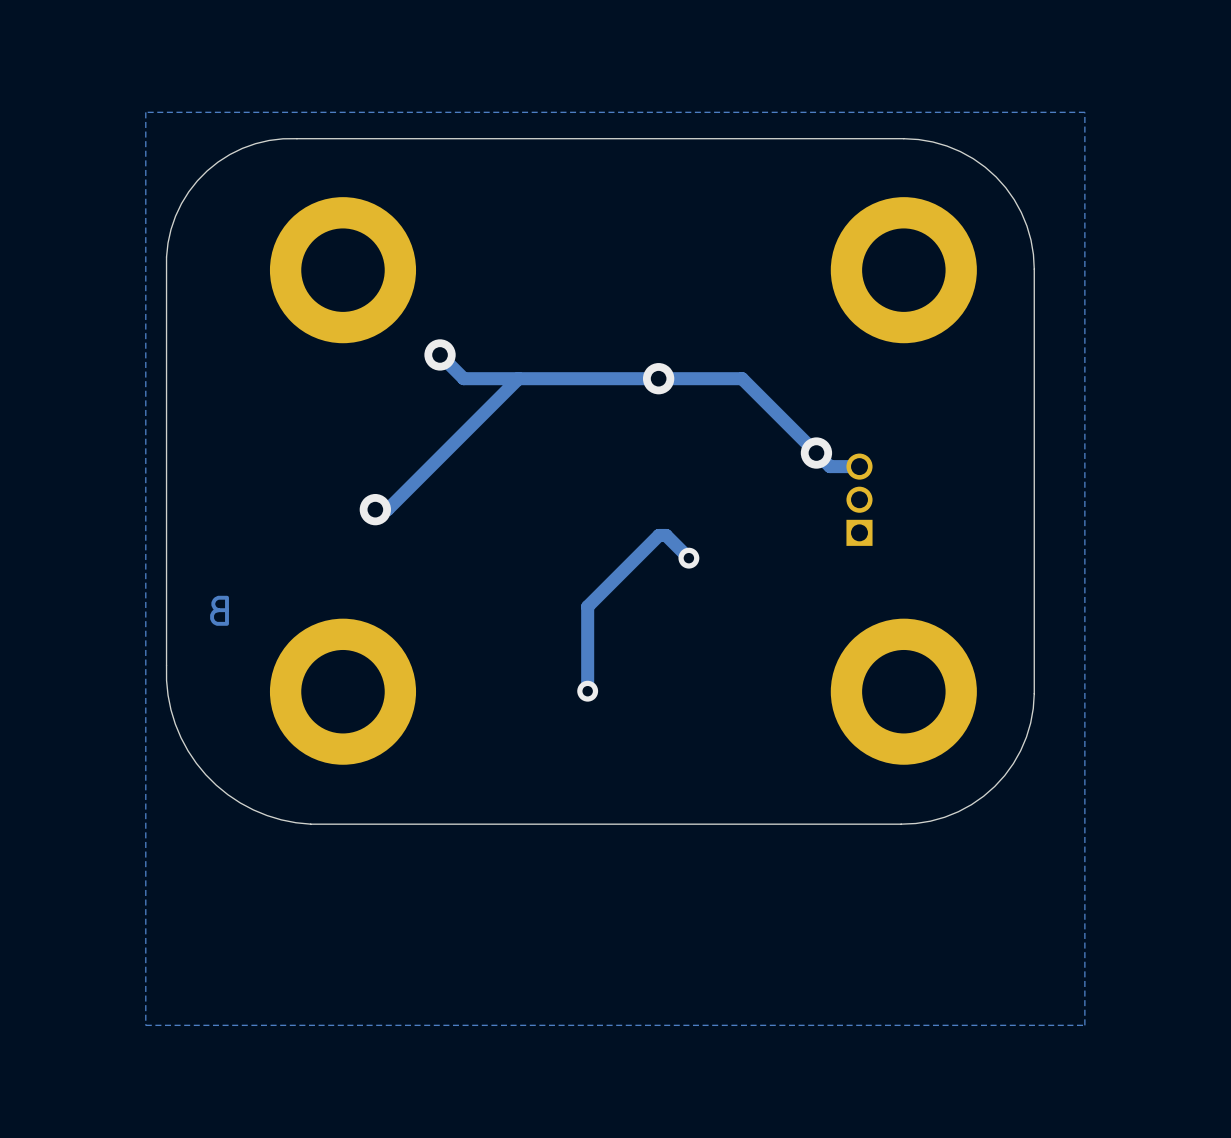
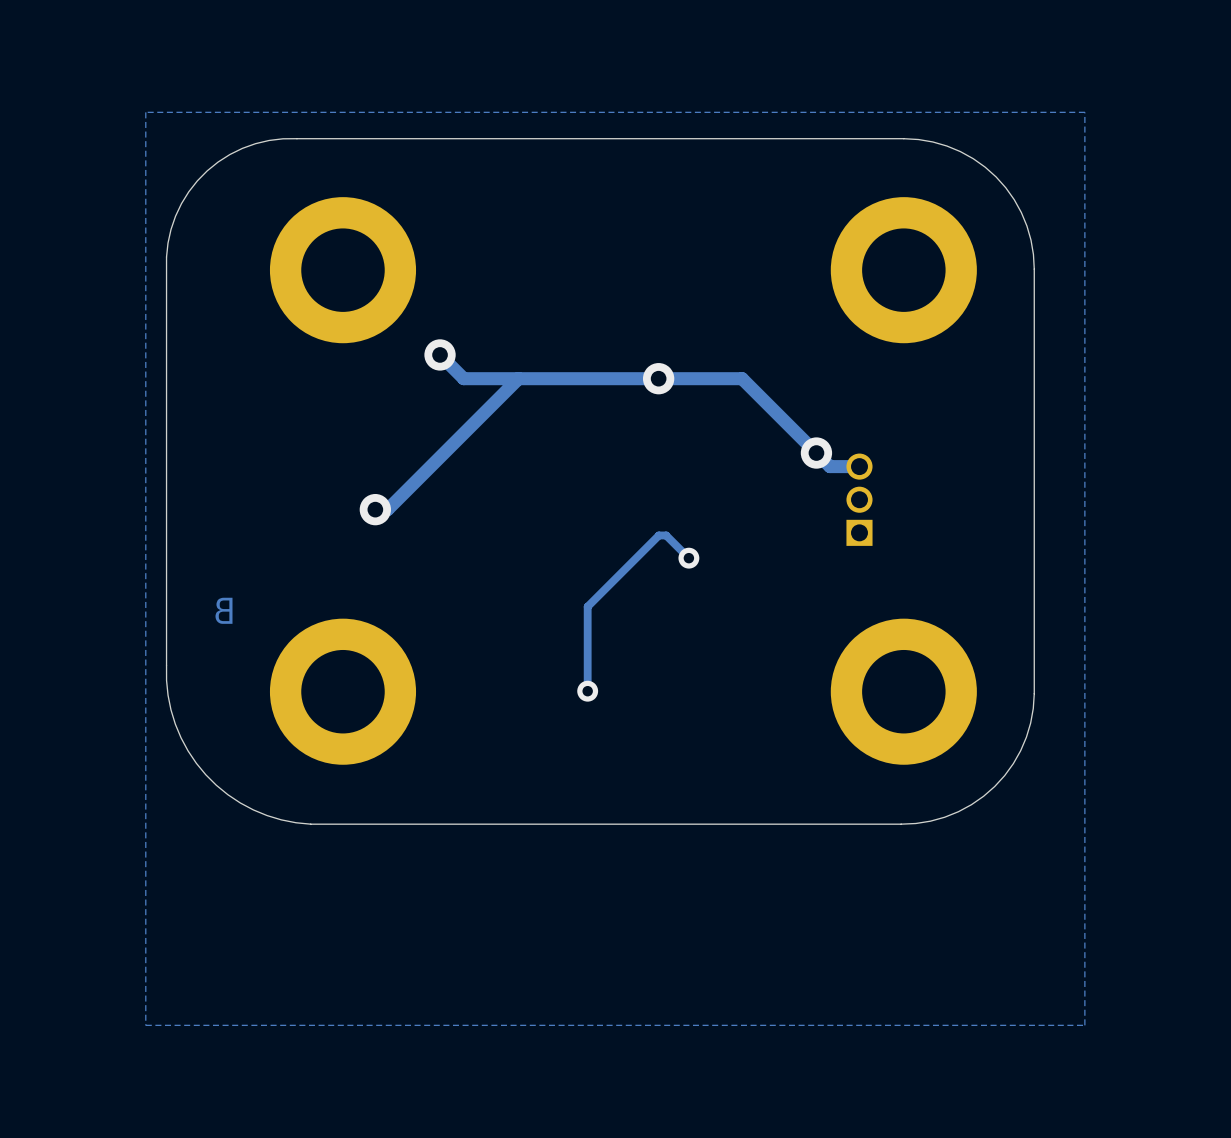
track width: thick (688, 558) (666, 535) (658, 535) (587, 606) (587, 691) -> thin (688, 558) (666, 535) (658, 535) (587, 606) (587, 691)

